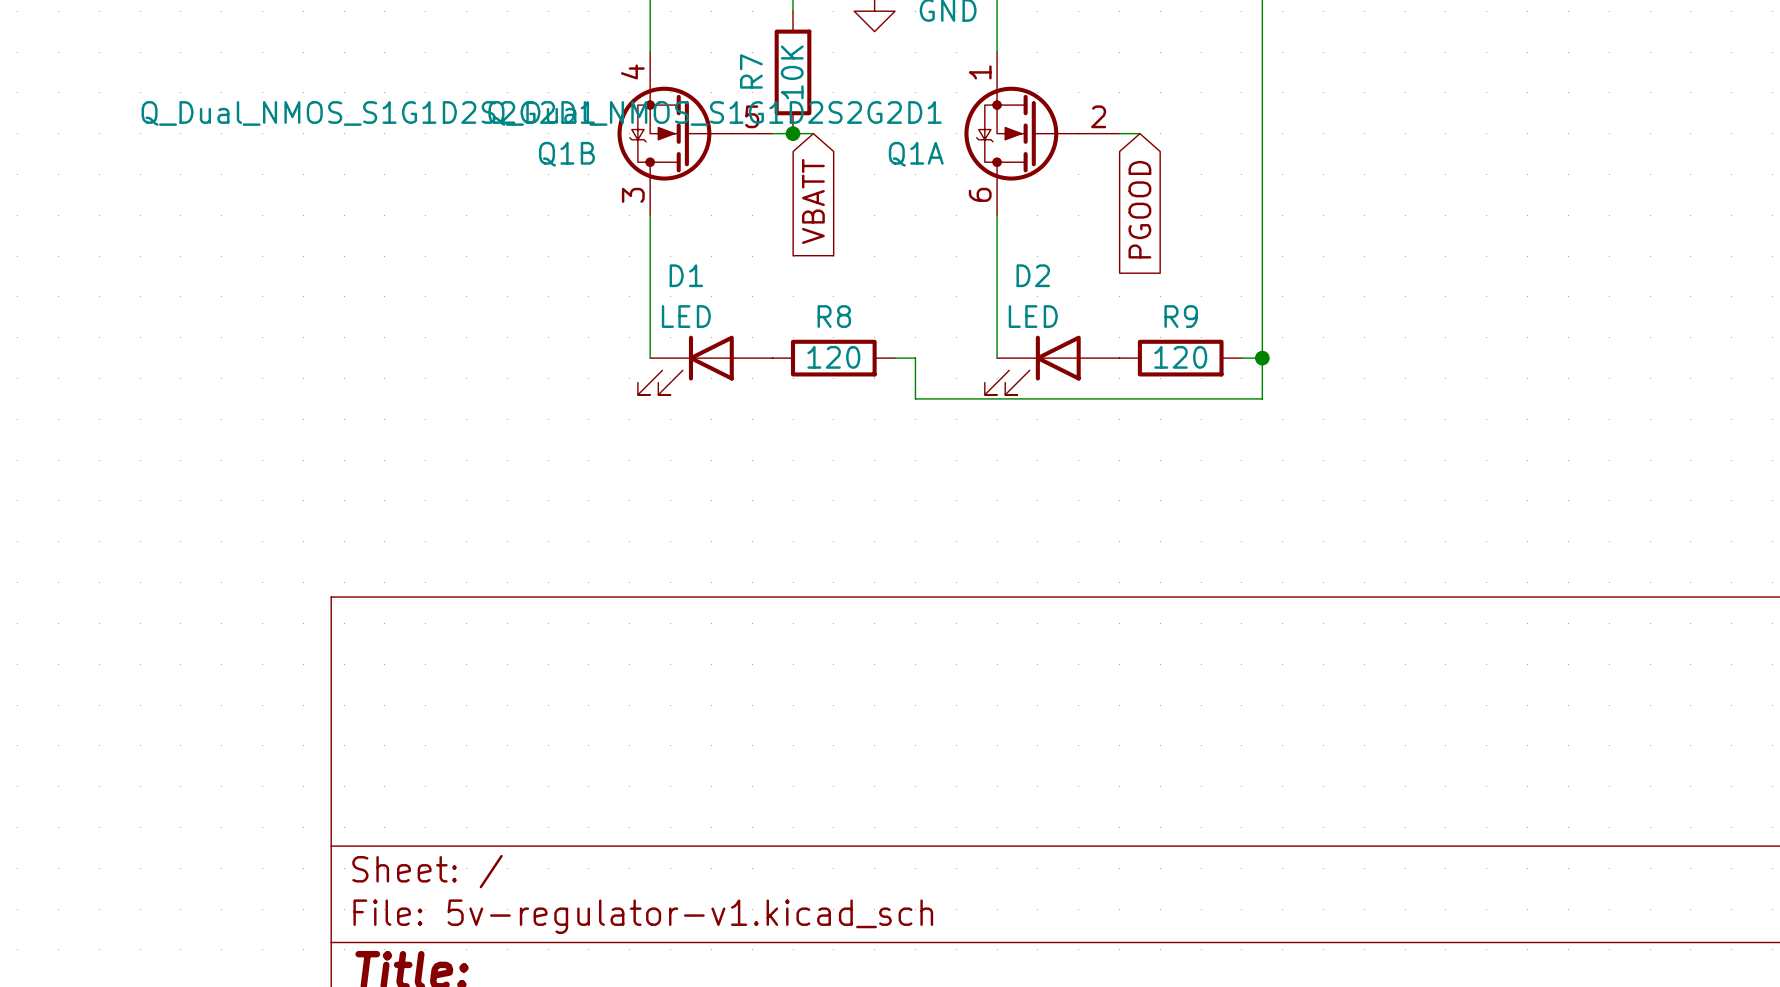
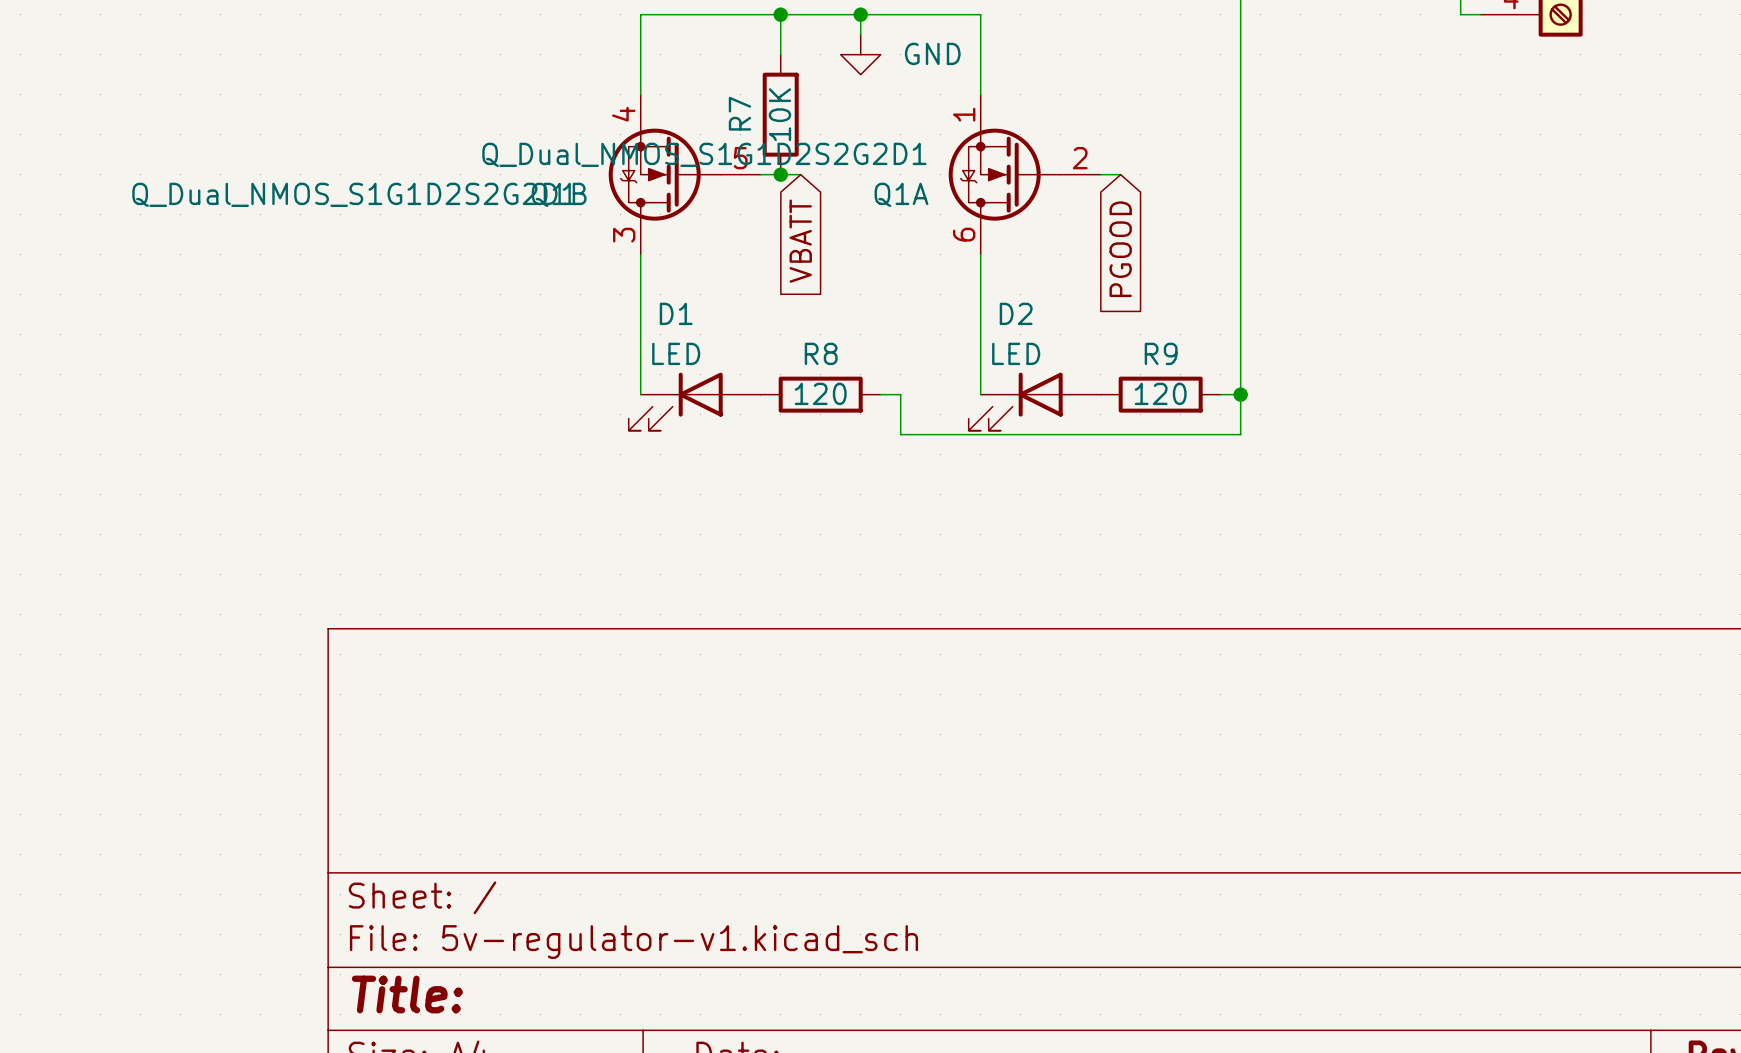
Q1B value position: Q_Dual_NMOS_S1G1D2S2G2D1 (368, 113) -> Q_Dual_NMOS_S1G1D2S2G2D1 (354, 194)

